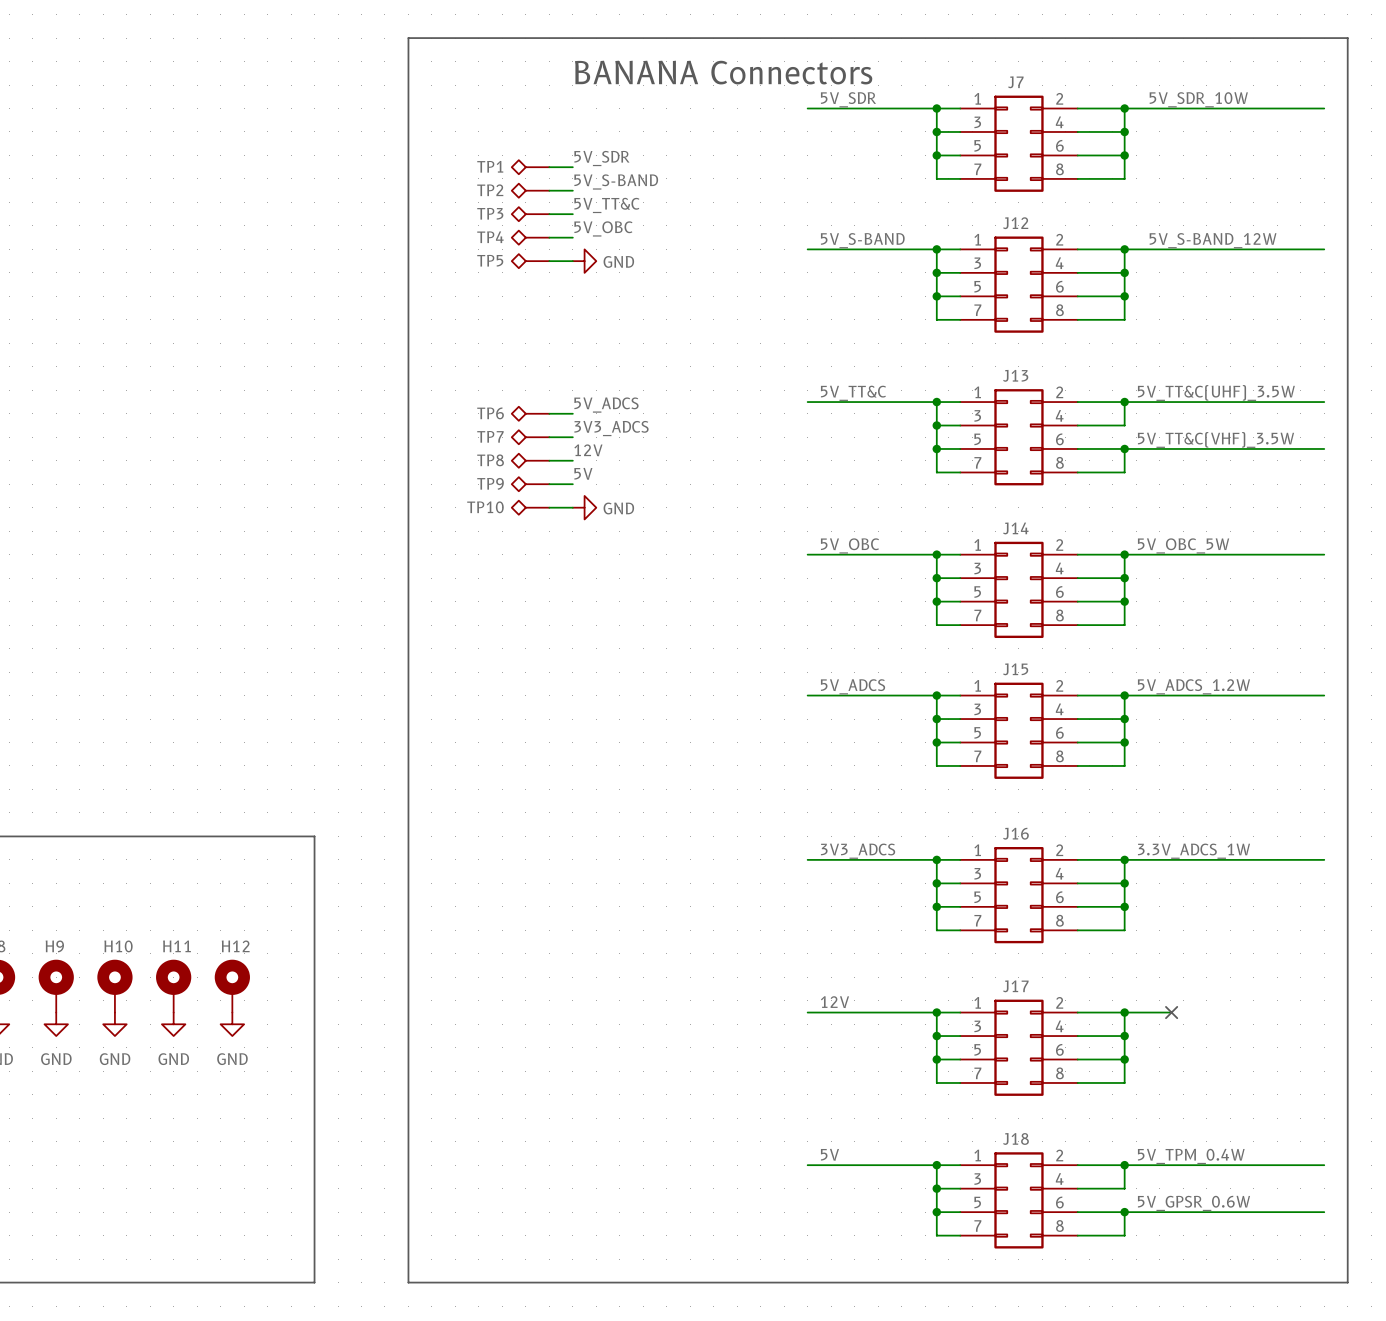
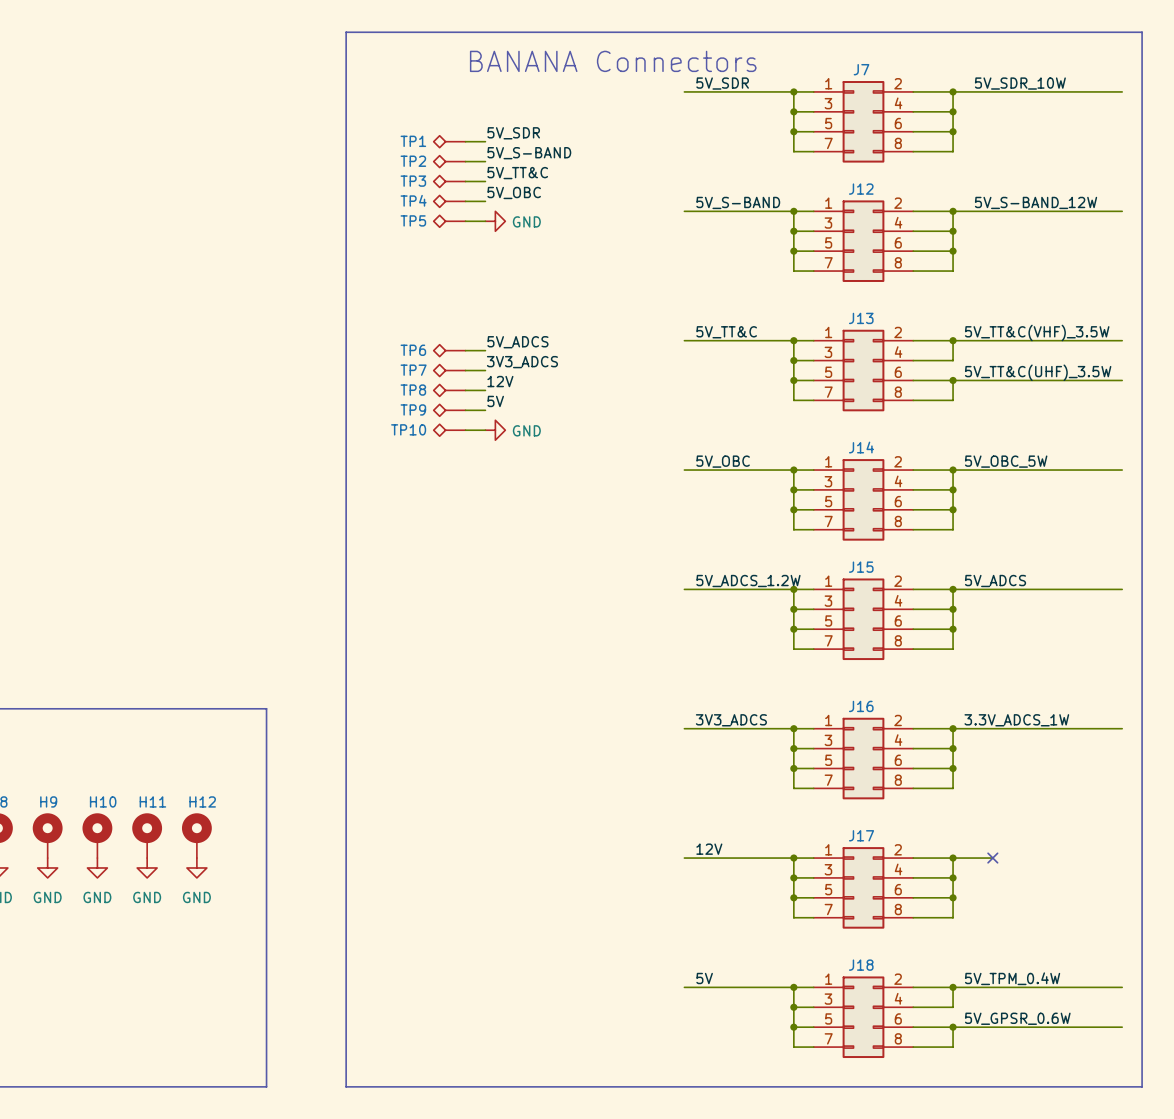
label: 5V_TT&C(UHF)_3.5W (1216, 393) -> 5V_TT&C(VHF)_3.5W (1037, 332)
label: 5V_TT&C(VHF)_3.5W (1216, 439) -> 5V_TT&C(UHF)_3.5W (1038, 372)
label: 5V_ADCS (853, 686) -> 5V_ADCS_1.2W (748, 581)
label: 5V_ADCS_1.2W (1193, 686) -> 5V_ADCS (995, 581)

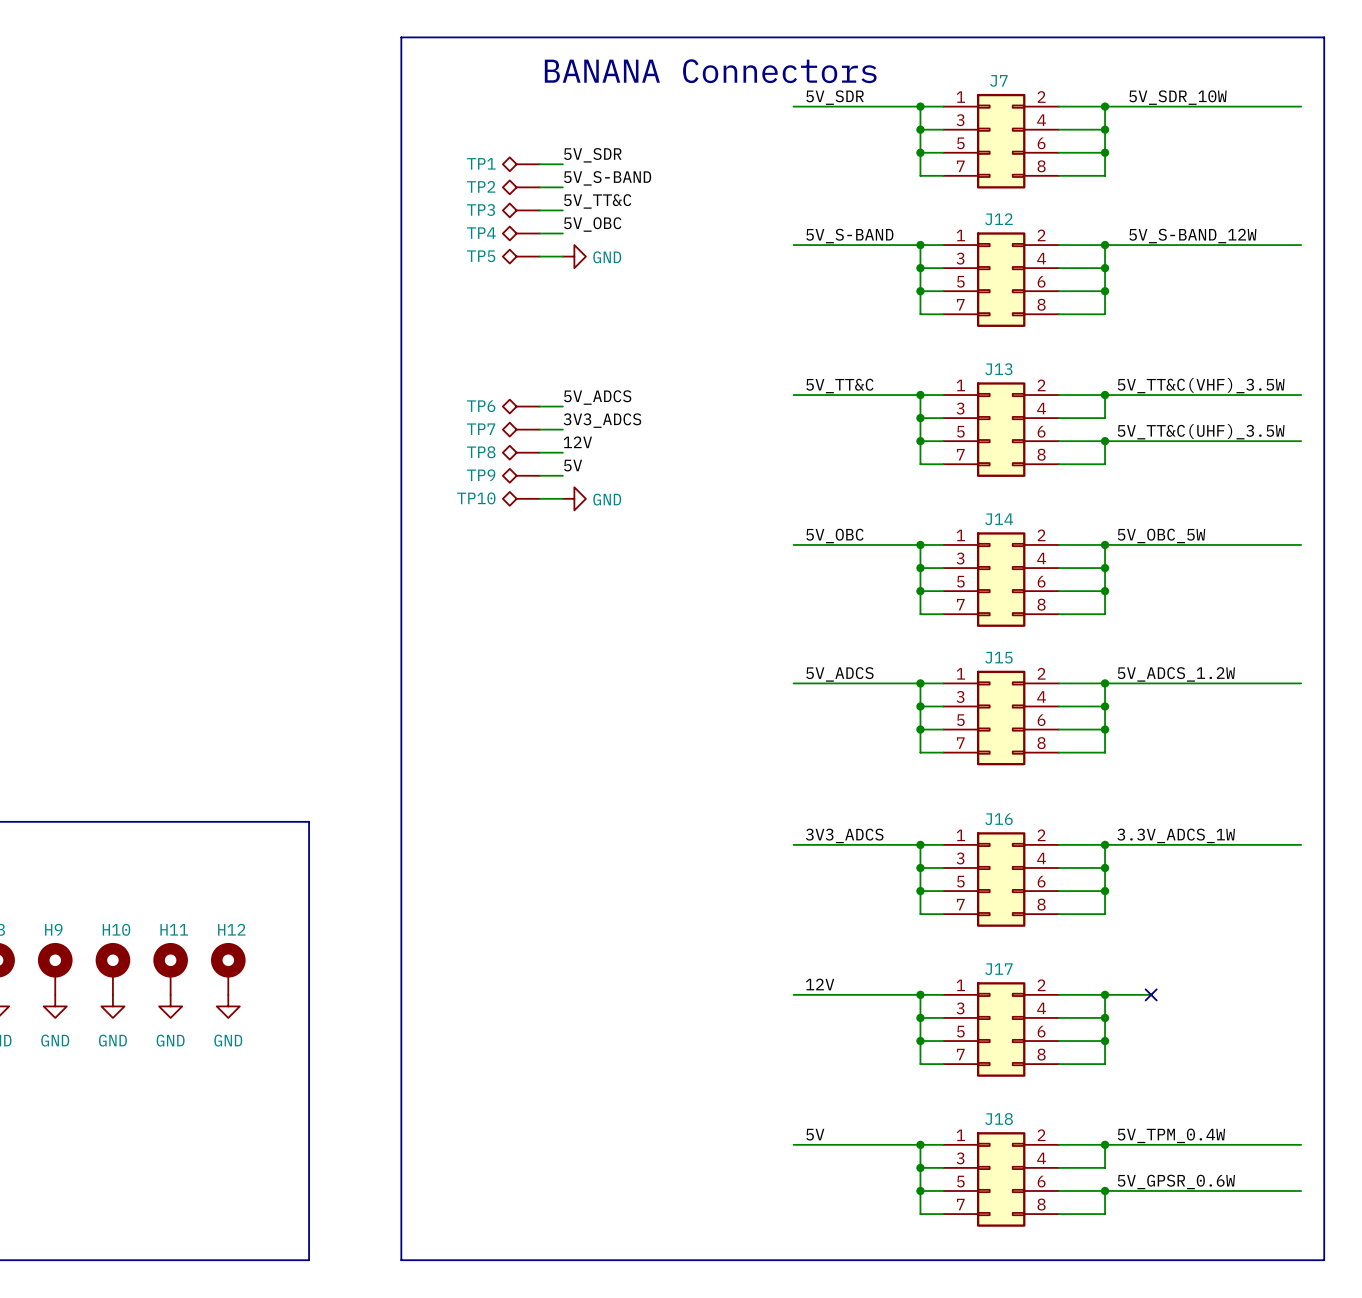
label: 5V_ADCS_1.2W (748, 581) -> 5V_ADCS (839, 674)
label: 5V_ADCS (995, 581) -> 5V_ADCS_1.2W (1176, 674)

